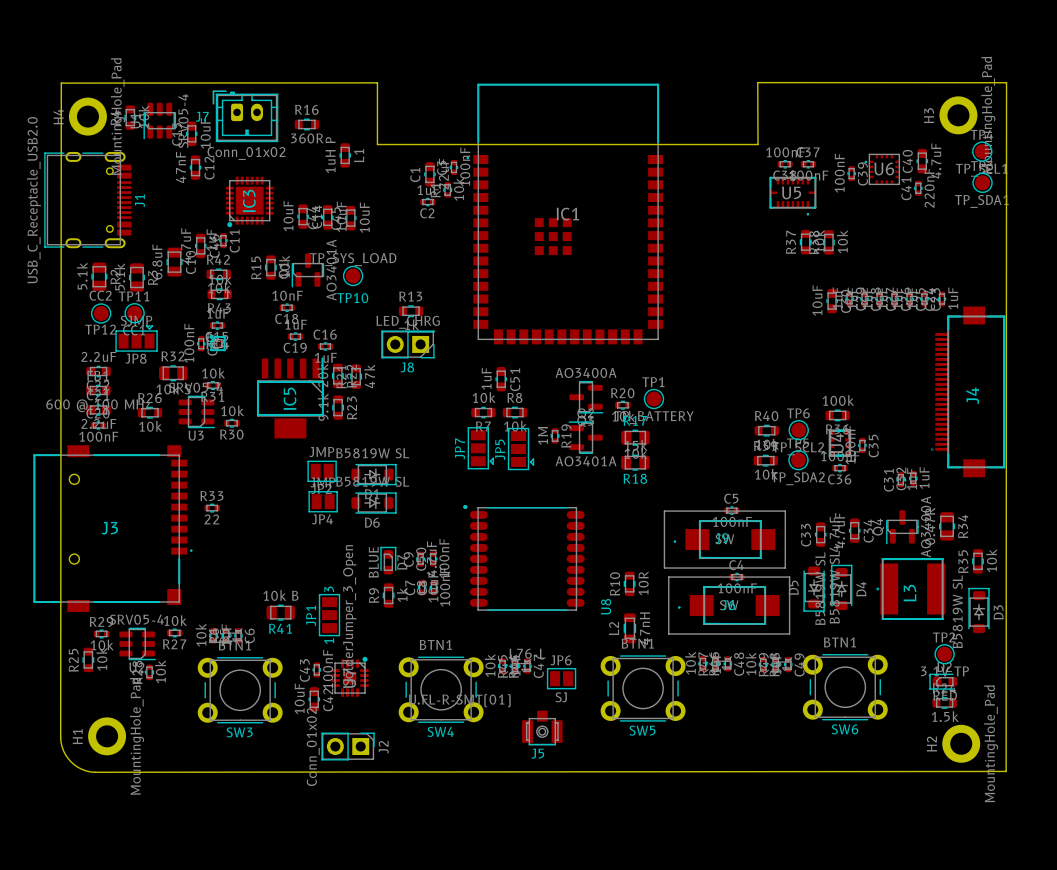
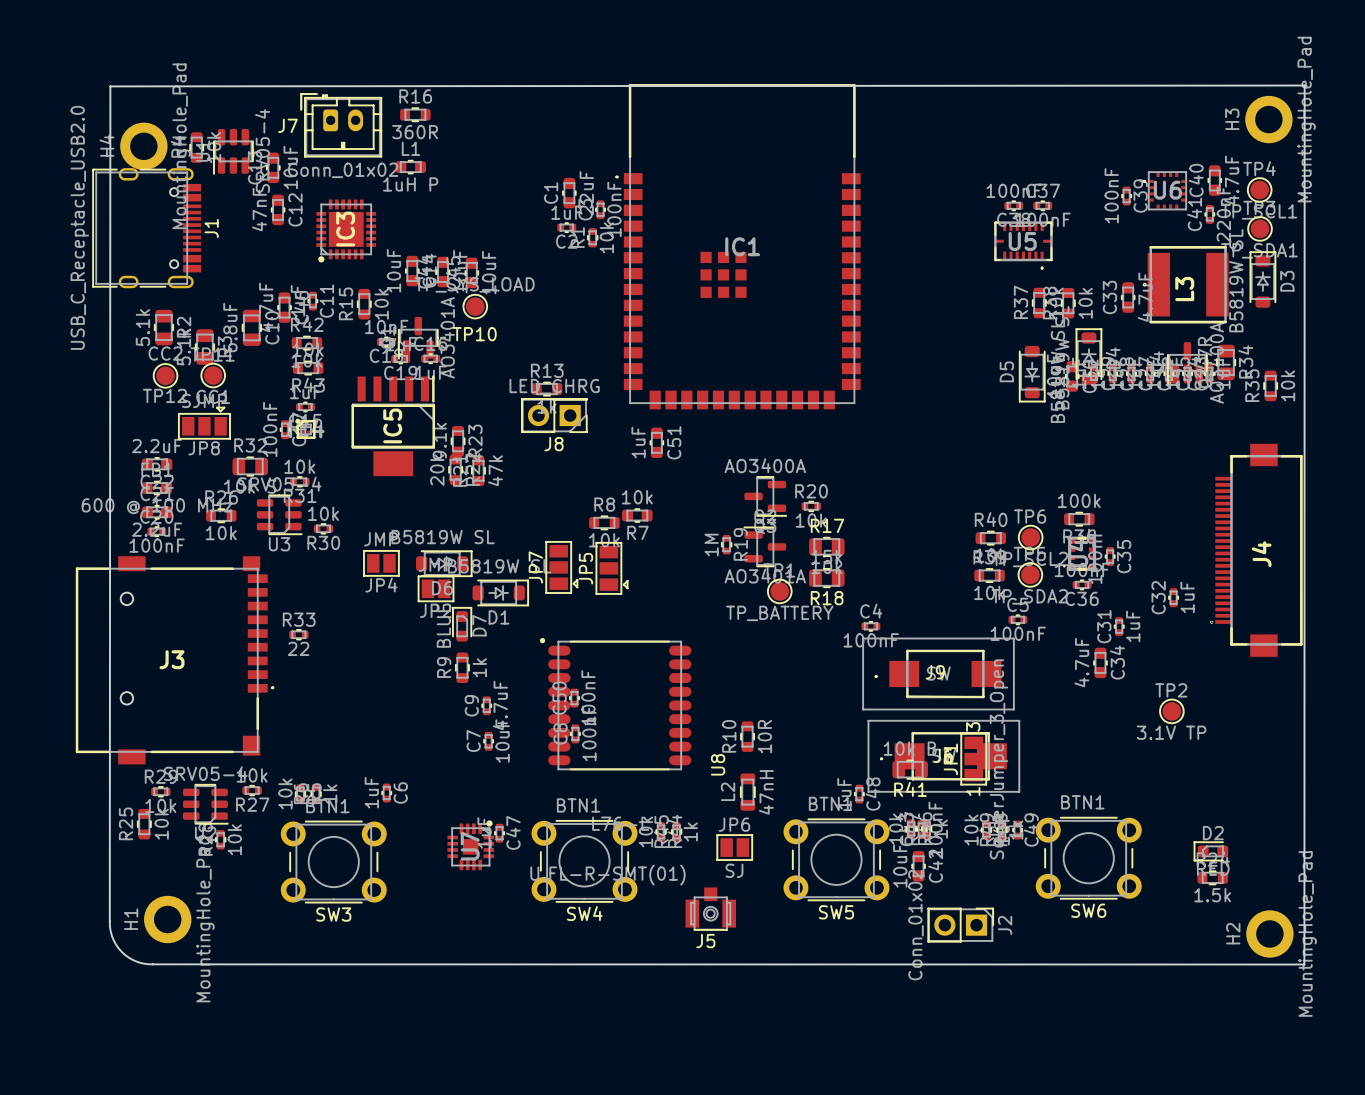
H3 position: (958, 115) -> (1268, 119)
J7 position: (245, 116) -> (341, 125)
R16 position: (306, 124) -> (415, 114)
L1 value position: 1uH P (330, 155) -> 1uH P (410, 184)
L1 rotation: 0° (345, 155) -> 90° clockwise (410, 167)
L1 position: (345, 155) -> (410, 167)
L1 name position: L1 (359, 155) -> L1 (411, 148)
C40 position: (922, 161) -> (1214, 180)
U6 position: (882, 169) -> (1164, 190)
C39 position: (851, 173) -> (1126, 196)
C1 position: (429, 174) -> (569, 193)
C41 position: (918, 188) -> (1209, 214)
J1 position: (87, 200) -> (146, 228)
IC3 position: (249, 201) -> (346, 230)
C2 position: (427, 202) -> (566, 227)
IC1 position: (564, 214) -> (738, 246)
R15 position: (270, 267) -> (364, 304)
TP10 position: (353, 275) -> (475, 306)
R2 position: (99, 276) -> (163, 327)
C18 position: (287, 307) -> (386, 341)
TP12 position: (101, 313) -> (165, 375)
TP11 position: (134, 313) -> (213, 375)
C19 position: (295, 336) -> (400, 359)
J8 position: (407, 344) -> (554, 415)
C16 position: (325, 346) -> (430, 358)
C51 position: (501, 379) -> (656, 442)
J4 position: (968, 391) -> (1256, 550)
IC5 position: (290, 397) -> (393, 425)
TP1 position: (653, 398) -> (779, 591)
R23 position: (338, 407) -> (458, 441)
R8 position: (514, 412) -> (604, 522)
JP7 position: (480, 448) -> (561, 567)
JP5 position: (521, 449) -> (612, 568)
C31 position: (900, 479) -> (1119, 626)
JP4 position: (323, 501) -> (381, 563)
D6 position: (373, 503) -> (444, 563)
C5 position: (731, 510) -> (1017, 619)
R34 position: (947, 526) -> (1226, 362)
Q4 position: (902, 527) -> (1187, 363)
C33 position: (820, 534) -> (1128, 297)
U8 position: (524, 557) -> (615, 704)
C9 position: (420, 559) -> (486, 705)
D7 position: (388, 560) -> (462, 624)
R35 position: (977, 561) -> (1270, 385)
C4 position: (736, 577) -> (870, 626)
R10 position: (629, 583) -> (747, 736)
C7 position: (422, 587) -> (488, 741)
D4 position: (841, 587) -> (1088, 356)
D5 position: (814, 589) -> (1032, 374)
L3 position: (910, 589) -> (1185, 284)
R9 position: (388, 595) -> (462, 667)
D3 position: (979, 610) -> (1262, 279)
R41 position: (280, 612) -> (910, 769)
JP1 position: (329, 615) -> (973, 759)
L2 position: (629, 628) -> (747, 792)
C6 position: (238, 635) -> (386, 793)
TP2 position: (944, 654) -> (1171, 711)
C48 position: (727, 663) -> (859, 794)
C47 position: (527, 666) -> (499, 833)
C43 position: (316, 669) -> (921, 829)
C42 position: (314, 699) -> (918, 866)
H2 position: (961, 743) -> (1269, 933)
J2 position: (348, 746) -> (960, 925)
board edge: (95, 772) (1006, 771) (1006, 82) (757, 82) (758, 144) (377, 144) (377, 82) (61, 83) (60, 737) (63, 750) (71, 761) (82, 769) (95, 772) -> (1304, 85) (110, 86) (109, 921) (111, 935) (118, 948) (133, 960) (152, 964) (1304, 964) (1304, 85)

